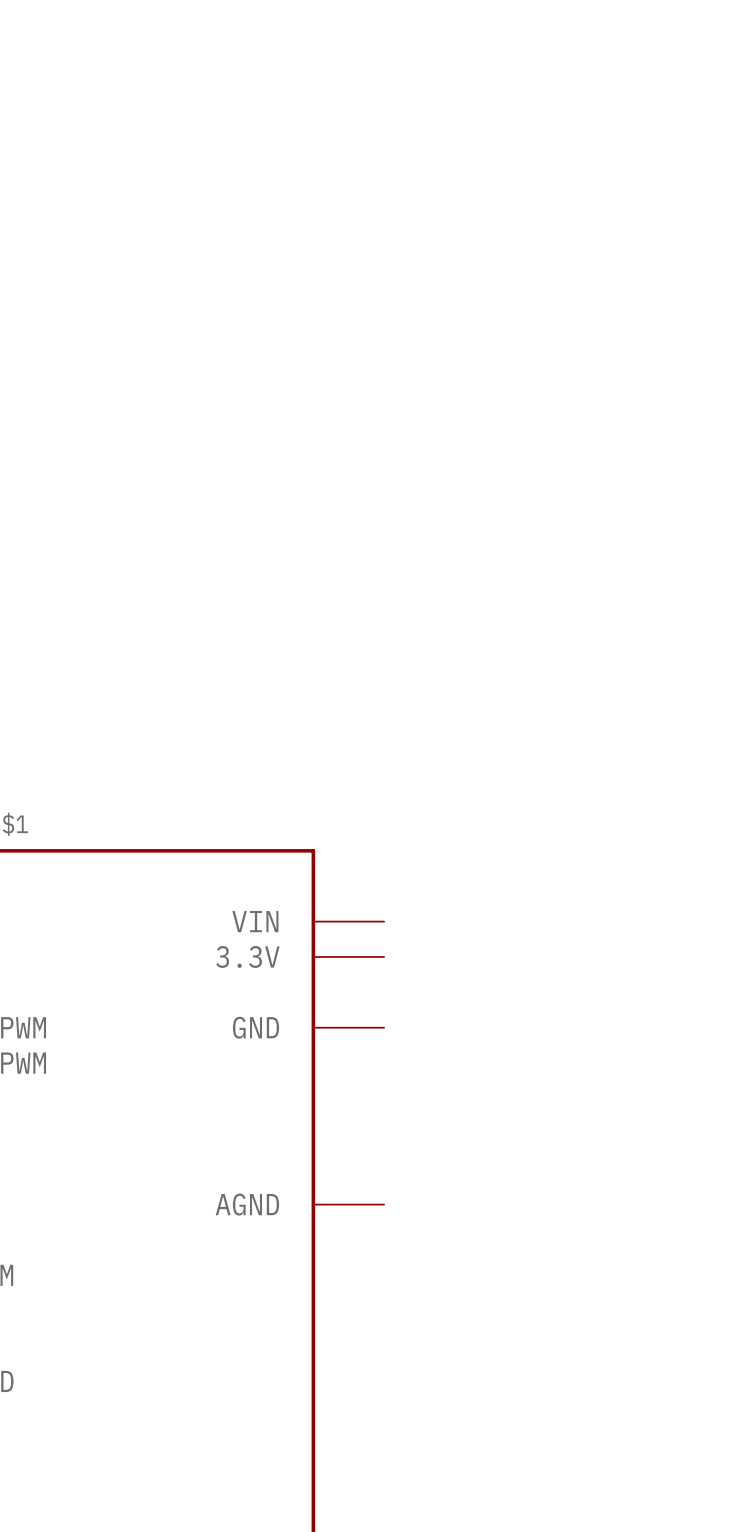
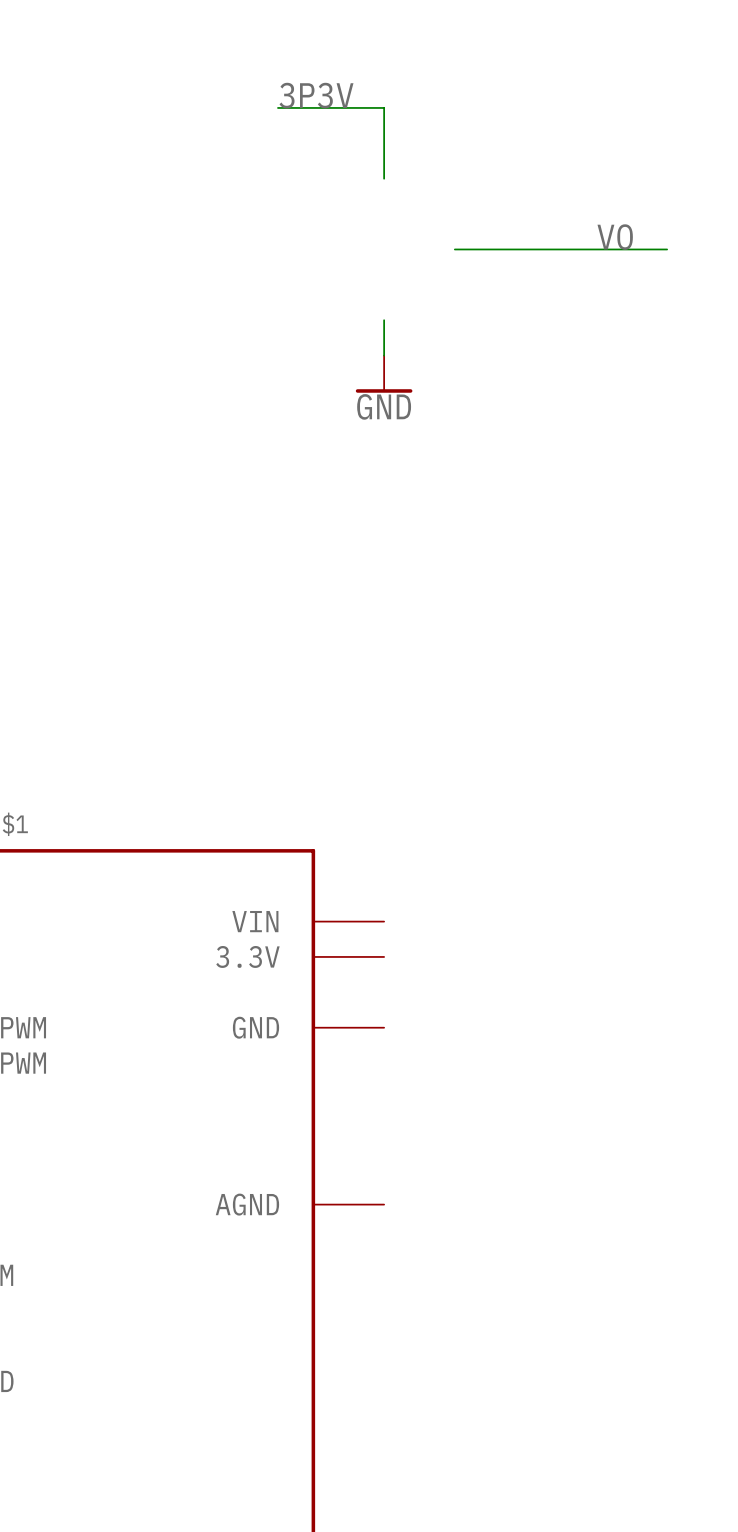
label: none -> 3P3V (316, 95)
wire: none -> (277, 107) (384, 107) (384, 178)
label: none -> VO (615, 237)
wire: none -> (454, 249) (667, 249)
wire: none -> (384, 320) (384, 355)
power symbol: none -> GND (384, 374)

